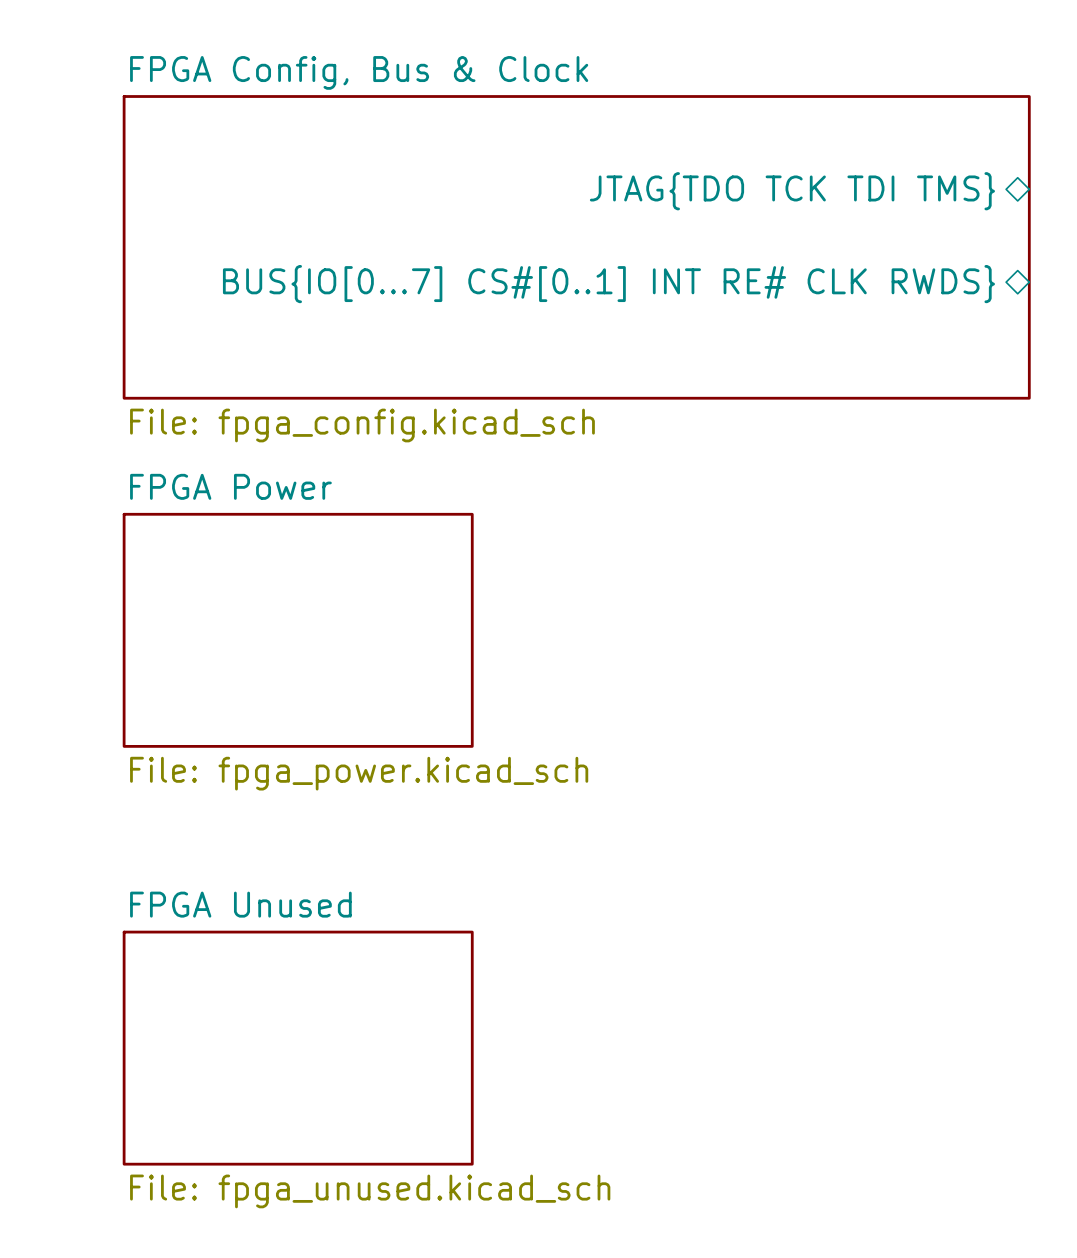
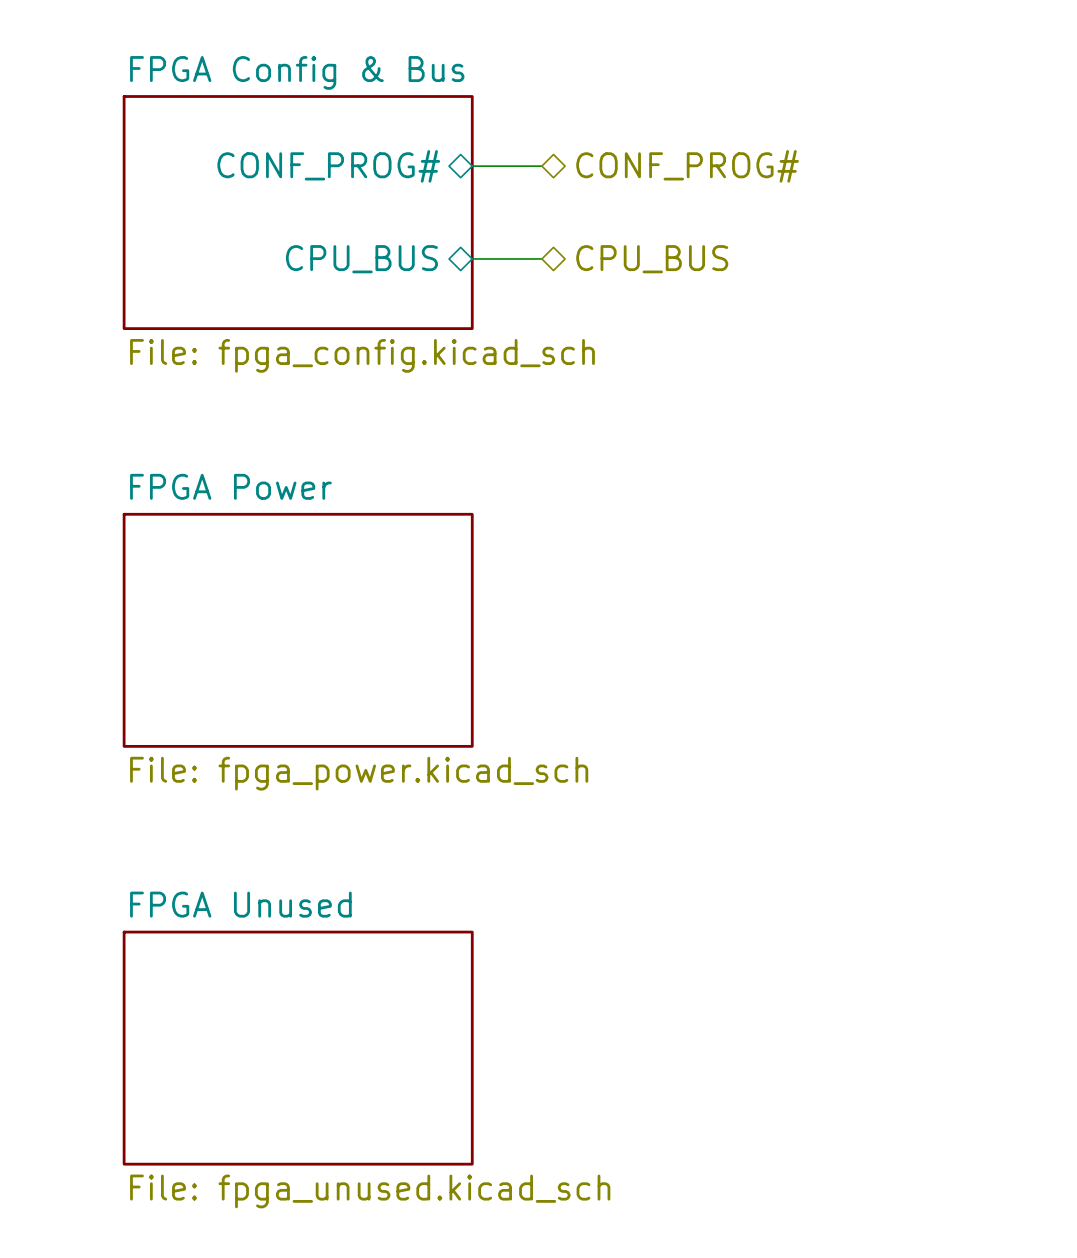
sheet pin: none -> CONF_PROG# (328, 166)
wire: none -> (472, 166) (541, 166)
hierarchical label: none -> CONF_PROG# (687, 166)
sheet pin: JTAG{TDO TCK TDI TMS} (792, 191) -> none
sheet FPGA Config & Bus: none -> File: fpga_config.kicad_sch (298, 212)
sheet FPGA Config, Bus & Clock: File: fpga_config.kicad_sch (576, 247) -> none
wire: none -> (472, 258) (541, 258)
sheet pin: none -> CPU_BUS (361, 259)
hierarchical label: none -> CPU_BUS (652, 259)
sheet pin: BUS{IO[0...7] CS#[0..1] INT RE# CLK RWDS} (608, 284) -> none

